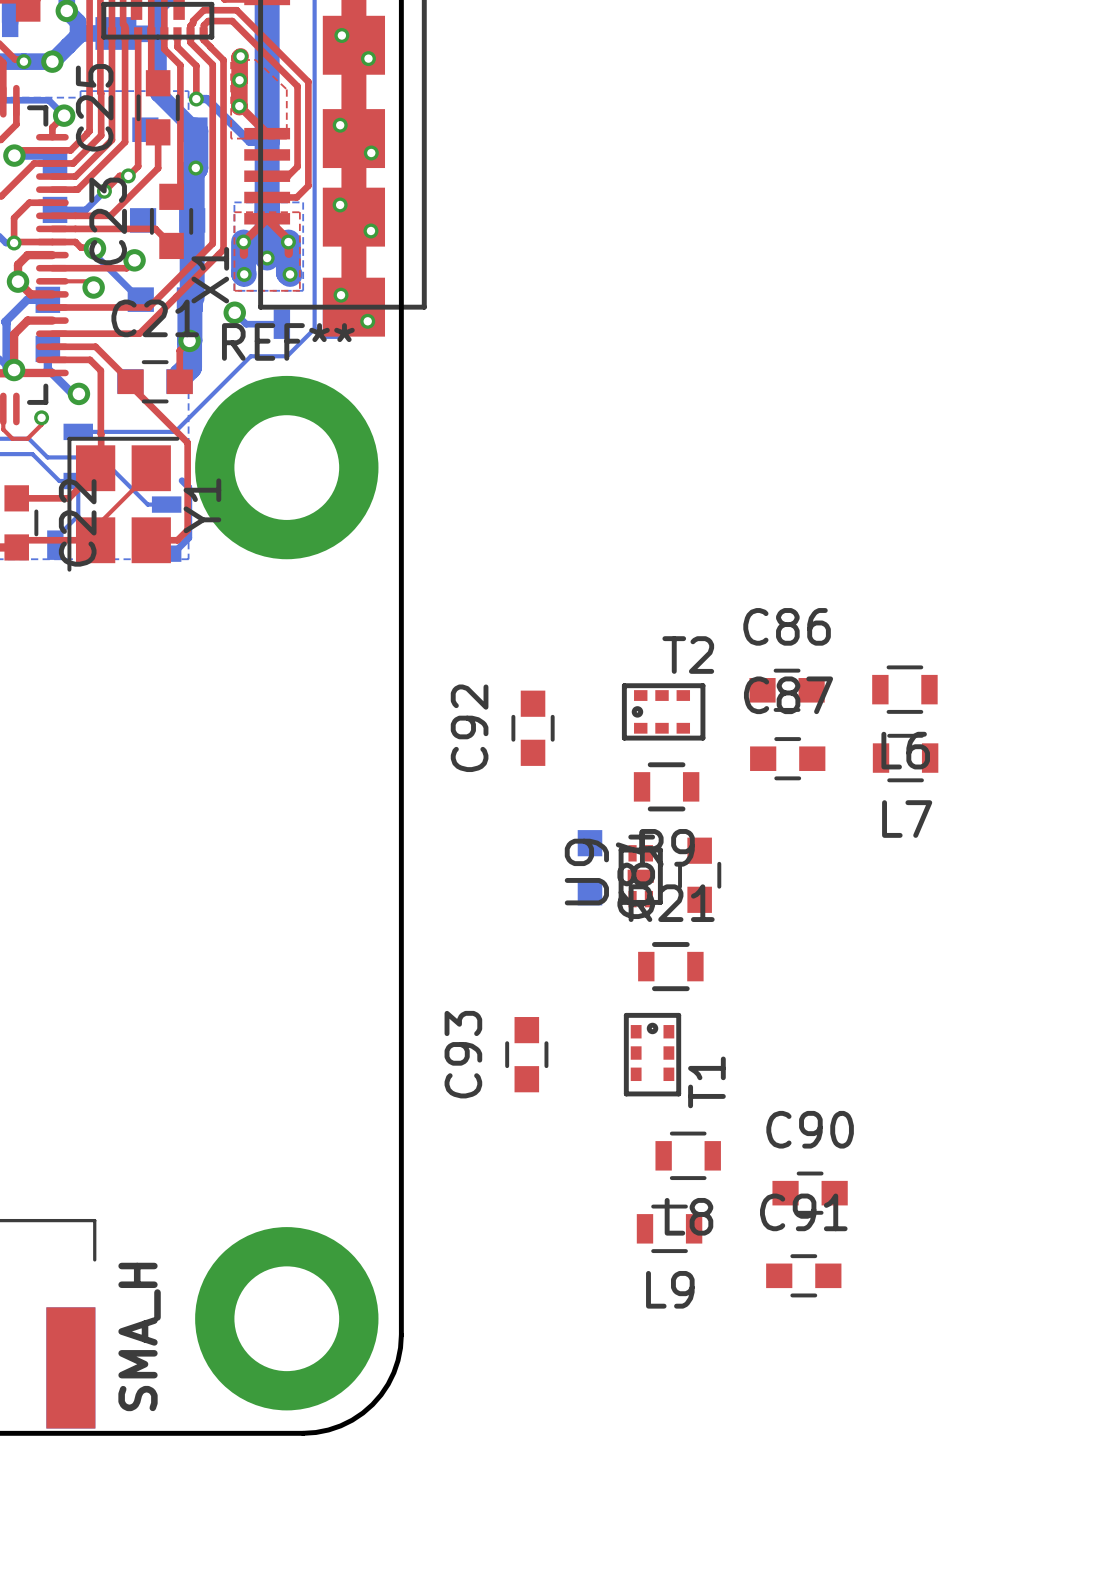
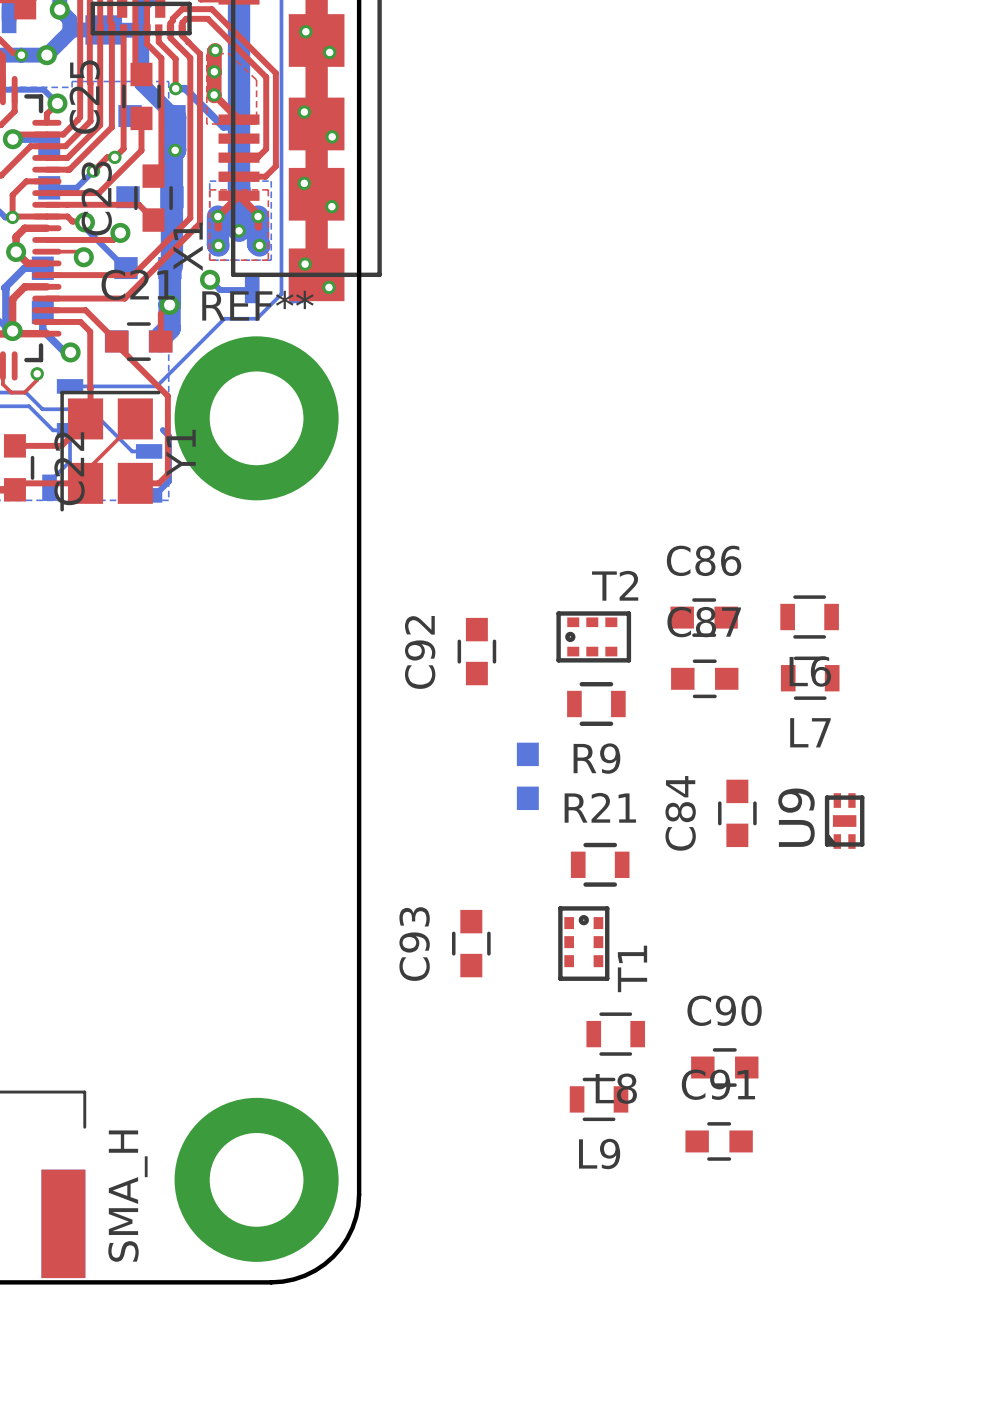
C84 position: (699, 875) -> (737, 813)
U9 position: (640, 876) -> (844, 821)

